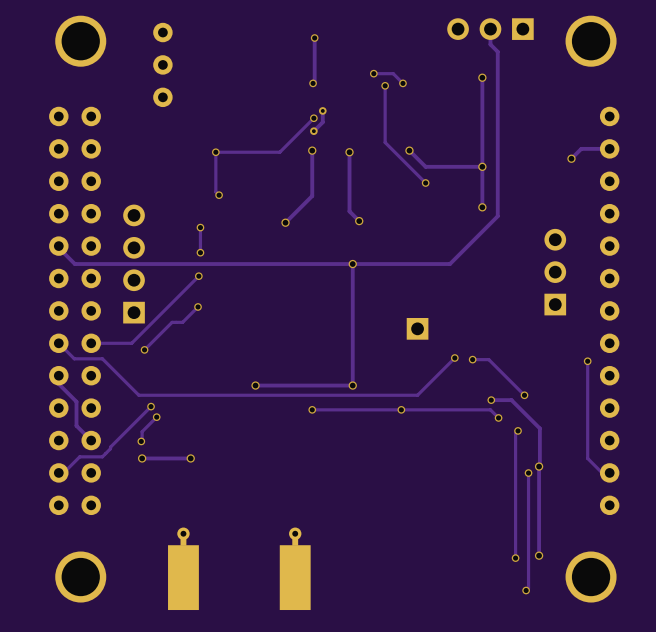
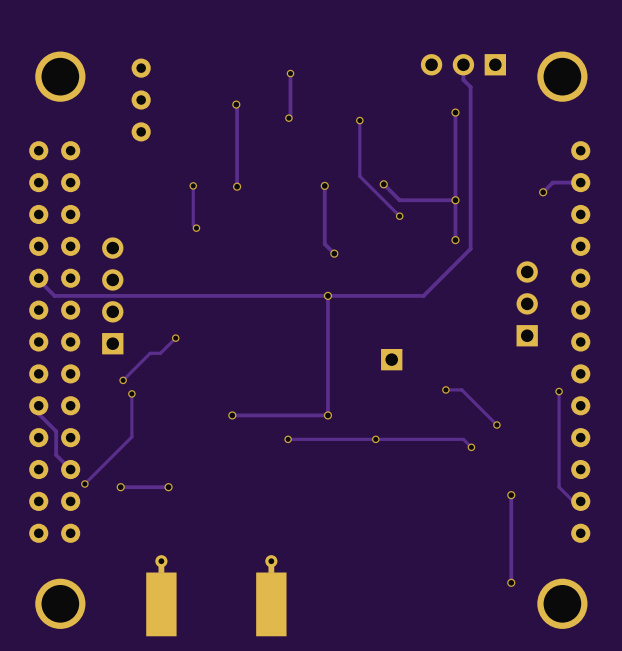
track: none -> (236, 104) (237, 186)
via: none -> (236, 104)
track: (373, 73) (393, 73) (402, 83) -> none
via: (373, 73) -> none
via: (402, 83) -> none
track: (322, 110) (322, 122) (313, 131) -> none
via: (322, 110) -> none
track: (313, 118) (279, 152) (215, 152) -> none
via: (313, 118) -> none
via: (313, 131) -> none
track: (312, 150) (312, 195) (285, 222) -> none
via: (312, 150) -> none
via: none -> (237, 186)
via: (285, 222) -> none
track: (200, 227) (200, 252) -> none
via: (200, 227) -> none
via: (200, 252) -> none
track: (198, 276) (131, 343) (91, 343) -> none
via: (198, 276) -> none
track: (58, 343) (74, 358) (102, 358) (138, 395) (417, 395) (454, 358) -> none
via: (454, 358) -> none
track: none -> (131, 393) (131, 436) (84, 483)
via: none -> (131, 393)
track: (491, 400) (511, 400) (539, 428) (539, 466) -> none
via: (491, 400) -> none
track: (151, 406) (102, 456) (79, 456) (63, 472) (58, 472) -> none
via: (151, 406) -> none
track: (156, 417) (142, 431) (141, 441) -> none
via: (156, 417) -> none
track: (518, 430) (515, 433) (515, 558) -> none
via: (518, 430) -> none
via: (141, 441) -> none
via: none -> (84, 483)
track: (528, 473) (528, 588) (526, 590) -> none
via: (528, 473) -> none
via: (515, 558) -> none
via: (526, 590) -> none

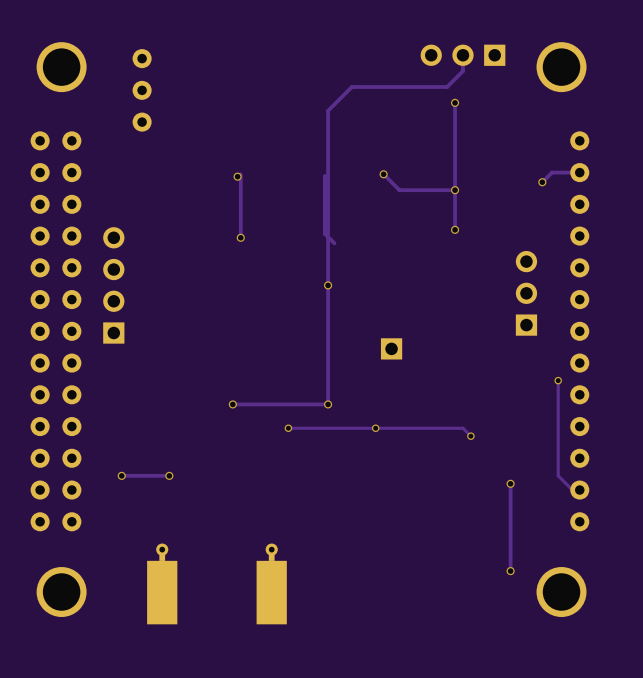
track: (290, 73) (290, 116) (288, 118) -> none
via: (290, 73) -> none
track: (463, 79) (470, 87) (470, 248) (423, 295) (54, 295) (38, 278) -> (462, 70) (447, 87) (351, 87) (328, 110) (328, 285)
track: (236, 104) (237, 186) -> none
via: (236, 104) -> none
via: (288, 118) -> none
track: (359, 120) (359, 176) (399, 216) -> none
via: (359, 120) -> none
track: none -> (240, 174) (240, 237)
track: (193, 185) (193, 224) (196, 228) -> none
via: (193, 185) -> none
via: (324, 185) -> none
via: (399, 216) -> none
via: (196, 228) -> none
via: none -> (240, 237)
via: (334, 253) -> none
track: (175, 338) (160, 353) (150, 353) (123, 380) -> none
via: (175, 338) -> none
via: (123, 380) -> none
track: (445, 389) (461, 389) (496, 425) -> none
via: (445, 389) -> none
track: (131, 393) (131, 436) (84, 483) -> none
via: (131, 393) -> none
track: (38, 405) (38, 413) (56, 431) (56, 455) (70, 469) -> none
via: (496, 425) -> none
via: (84, 483) -> none

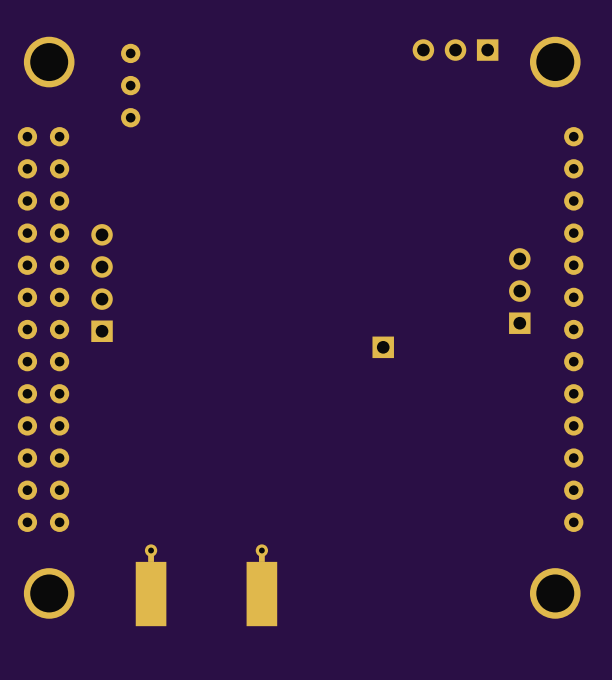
track: (462, 55) (462, 71) (447, 87) (351, 87) (328, 110) (328, 404) (232, 404) -> none
track: (455, 102) (455, 229) -> none
via: (455, 102) -> none
track: (579, 172) (551, 172) (542, 182) -> none
track: (240, 174) (240, 237) -> none
track: (383, 174) (399, 190) (455, 190) -> none
via: (383, 174) -> none
track: (324, 175) (324, 233) (334, 243) -> none
via: (237, 176) -> none
via: (542, 182) -> none
via: (455, 190) -> none
via: (455, 229) -> none
via: (240, 237) -> none
via: (328, 285) -> none
track: (558, 380) (558, 475) (572, 490) (579, 490) -> none
via: (558, 380) -> none
via: (232, 404) -> none
via: (328, 404) -> none
track: (288, 428) (462, 428) (470, 436) -> none
via: (288, 428) -> none
via: (375, 428) -> none
via: (470, 436) -> none
via: (121, 475) -> none
track: (169, 475) (121, 475) -> none
via: (169, 475) -> none
track: (510, 483) (510, 571) -> none
via: (510, 483) -> none
via: (510, 571) -> none

